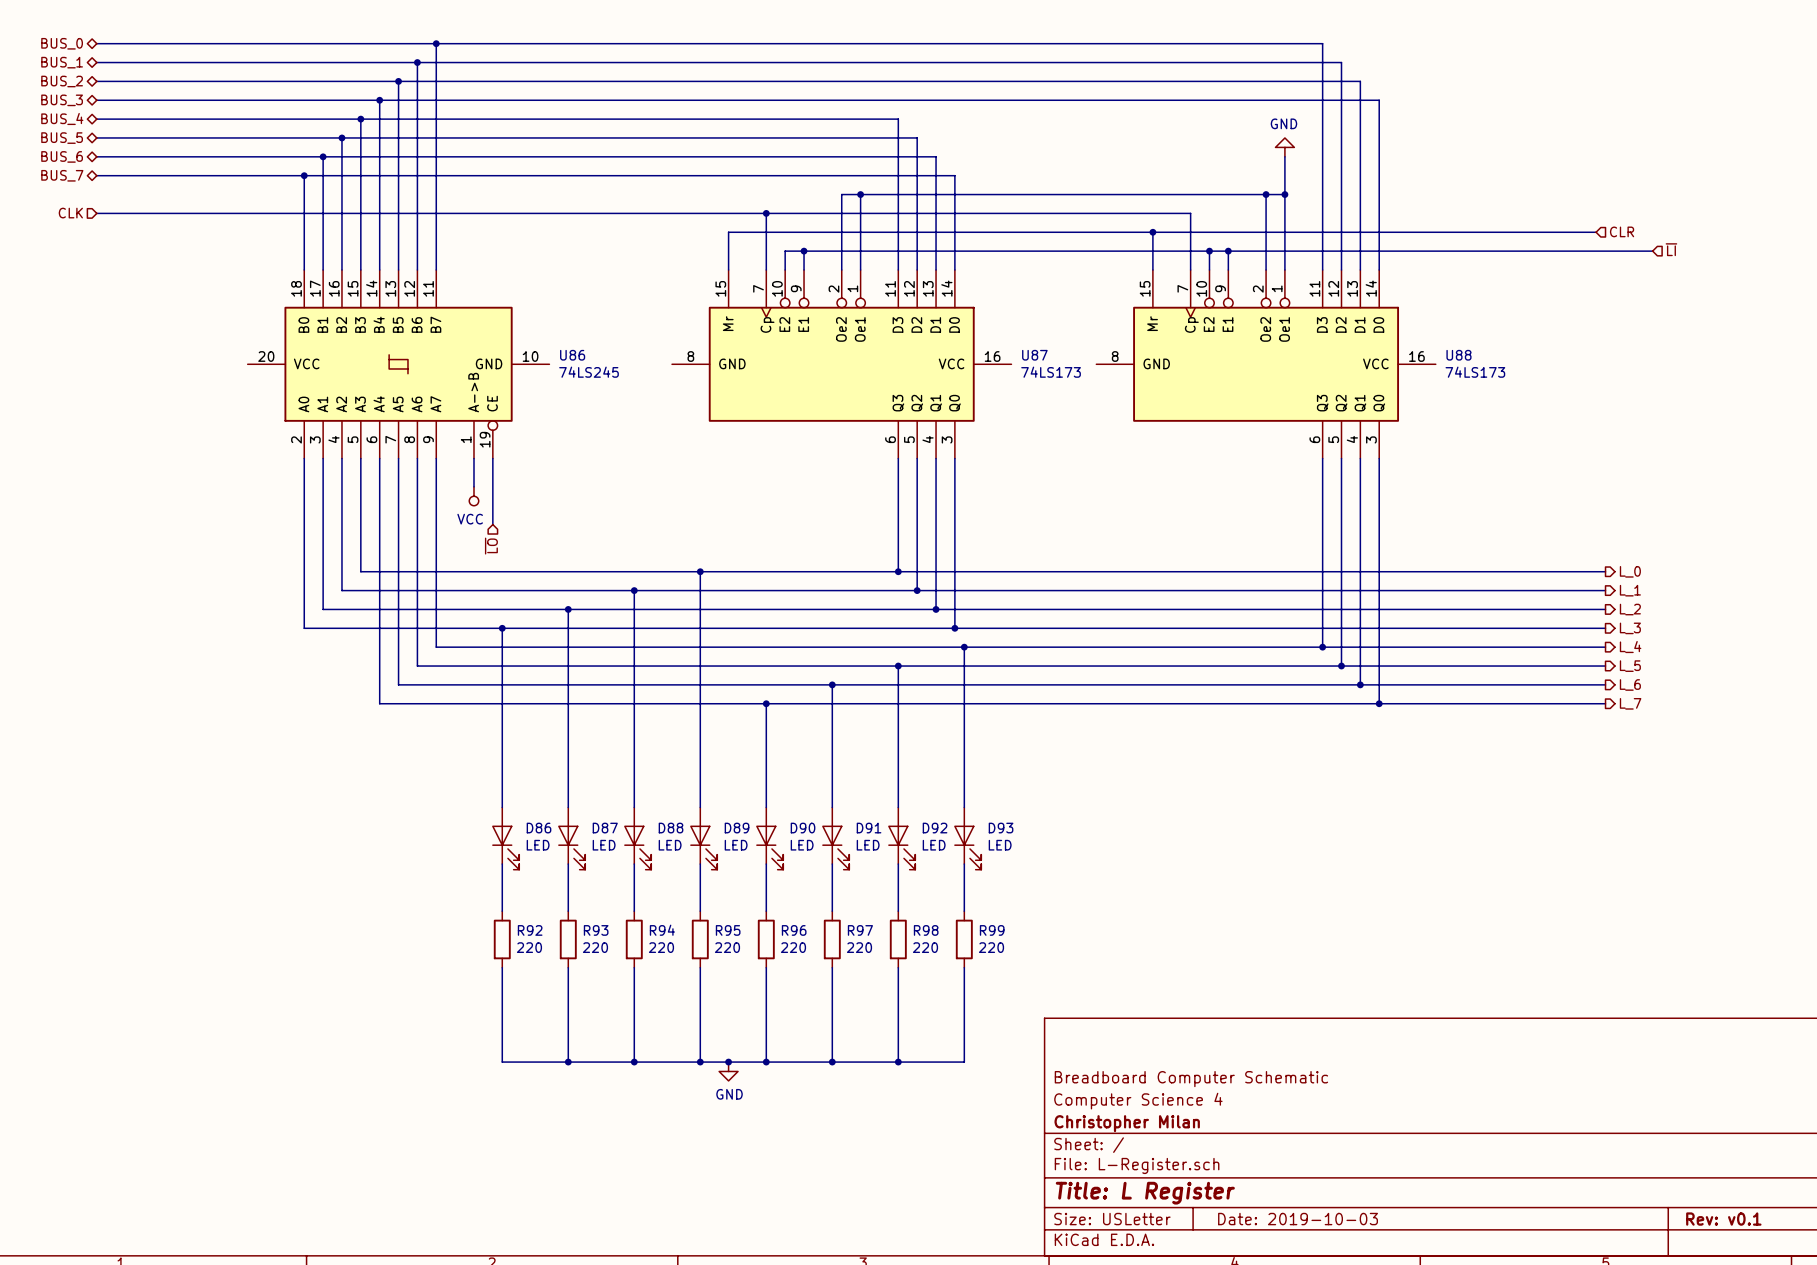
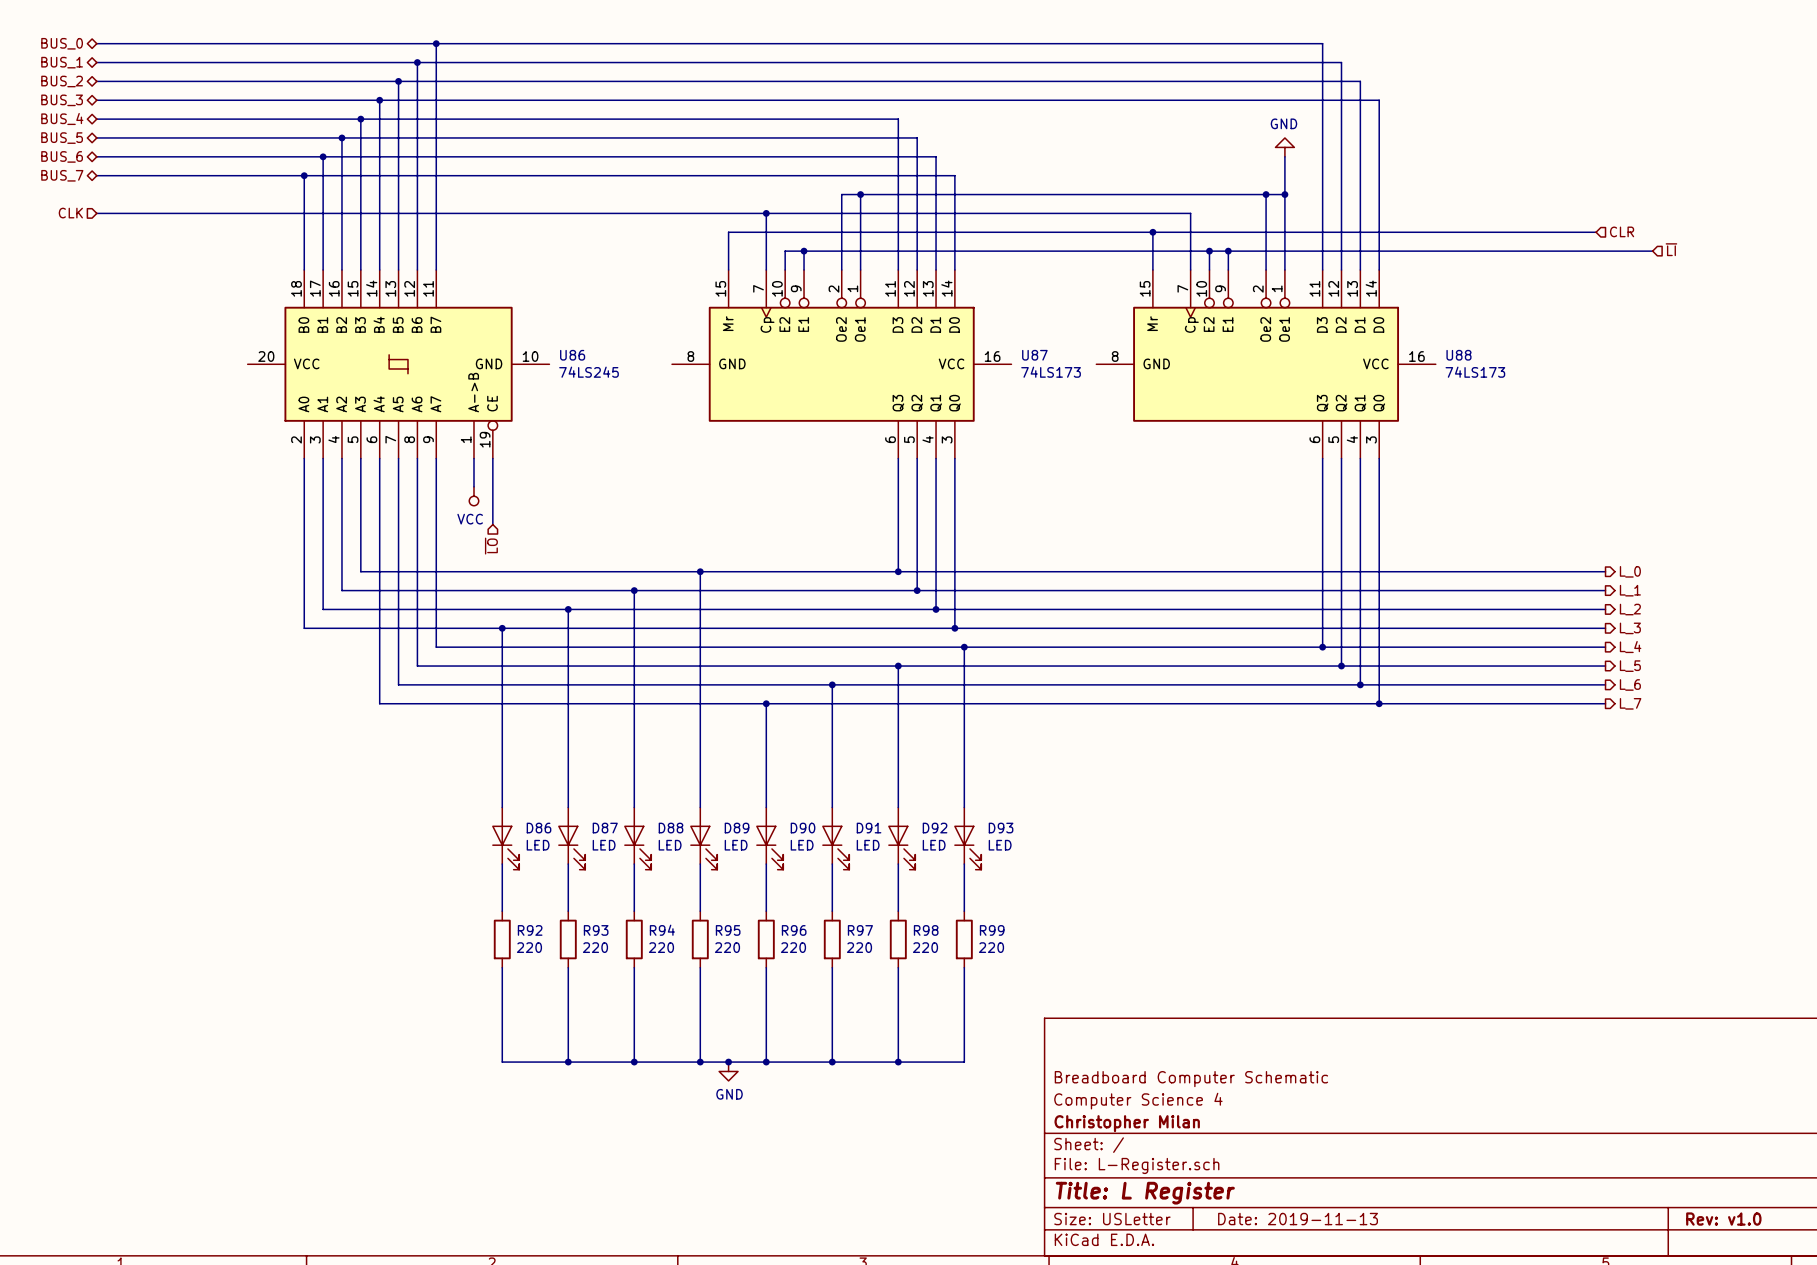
title block: Date: 2019-10-03 (1298, 1219) -> Date: 2019-11-13 (1298, 1219)
title block: Rev: v0.1 (1723, 1219) -> Rev: v1.0 (1723, 1219)

